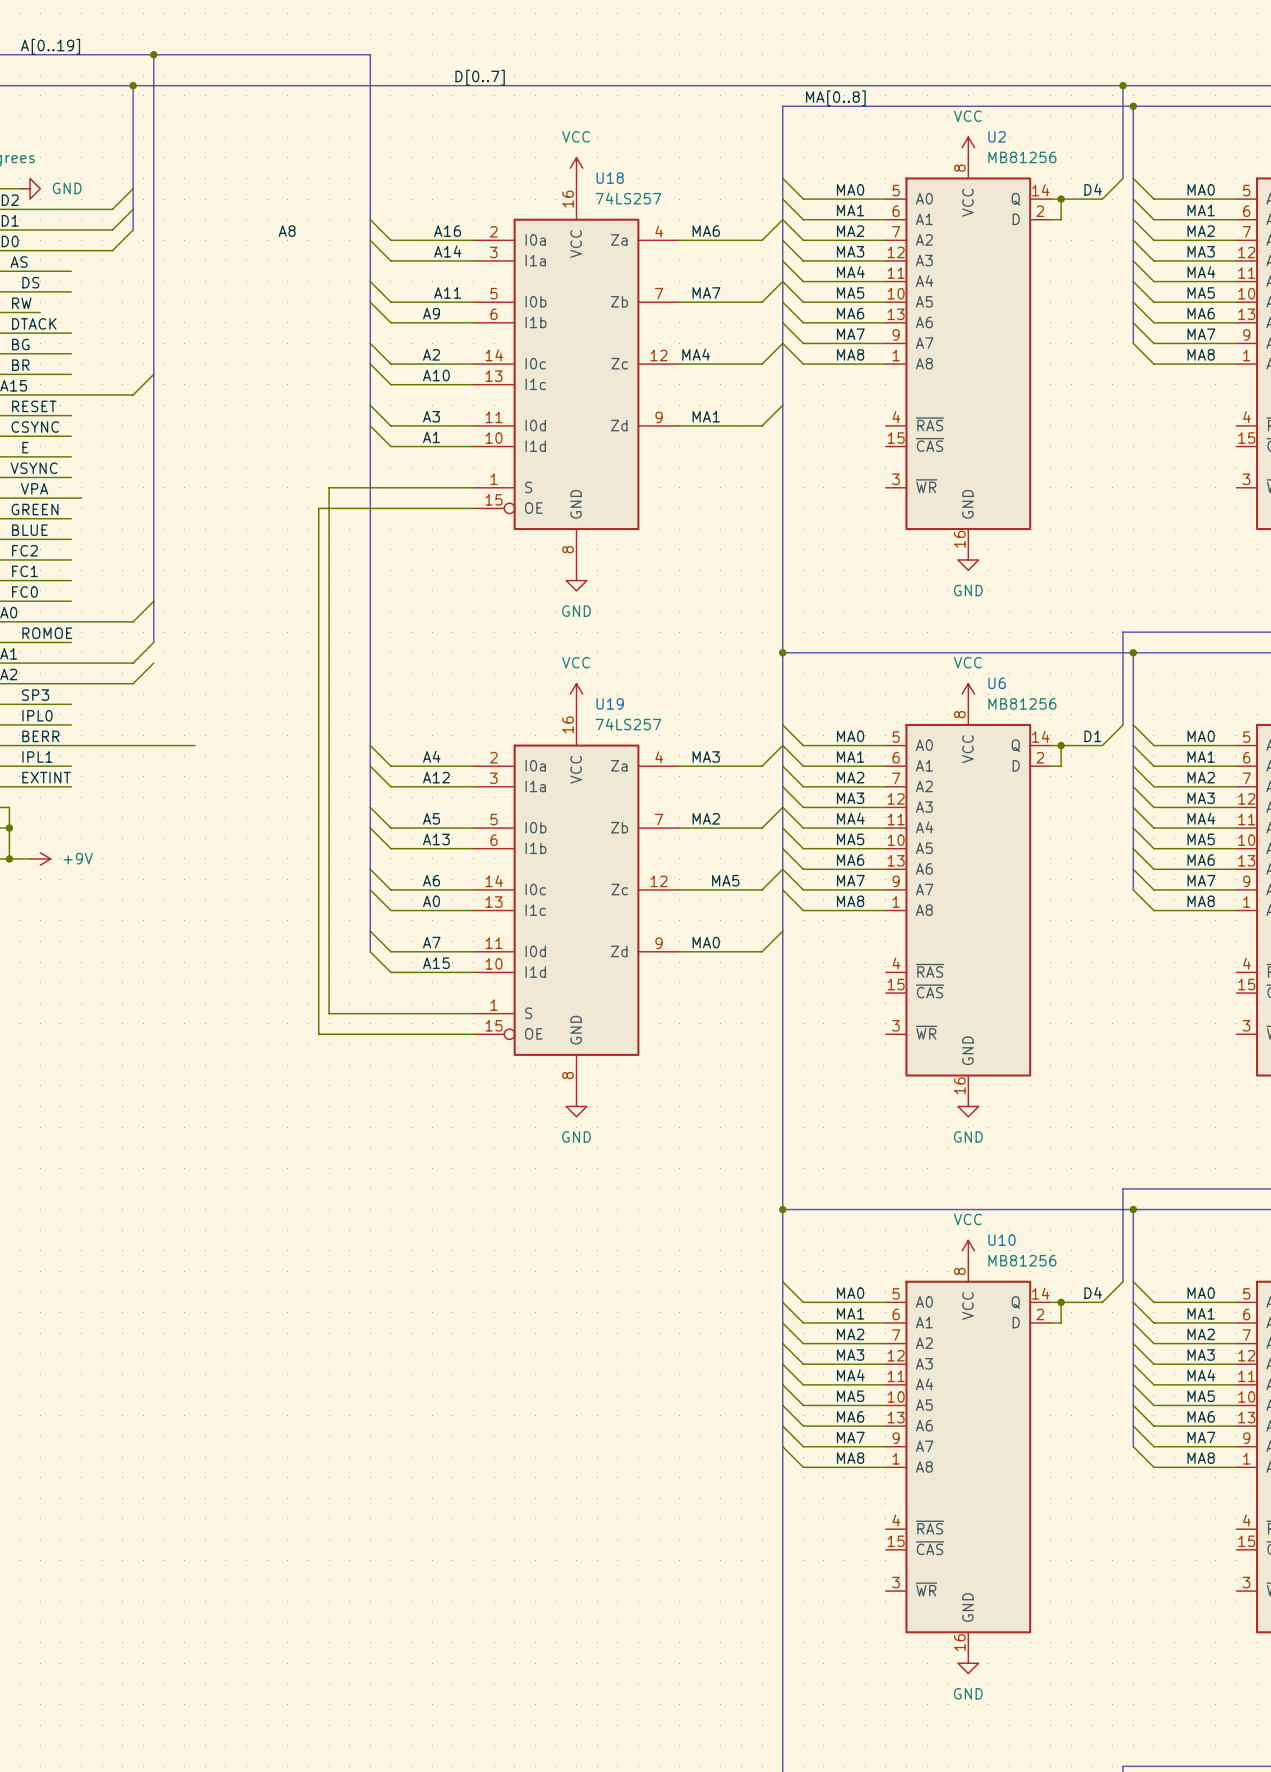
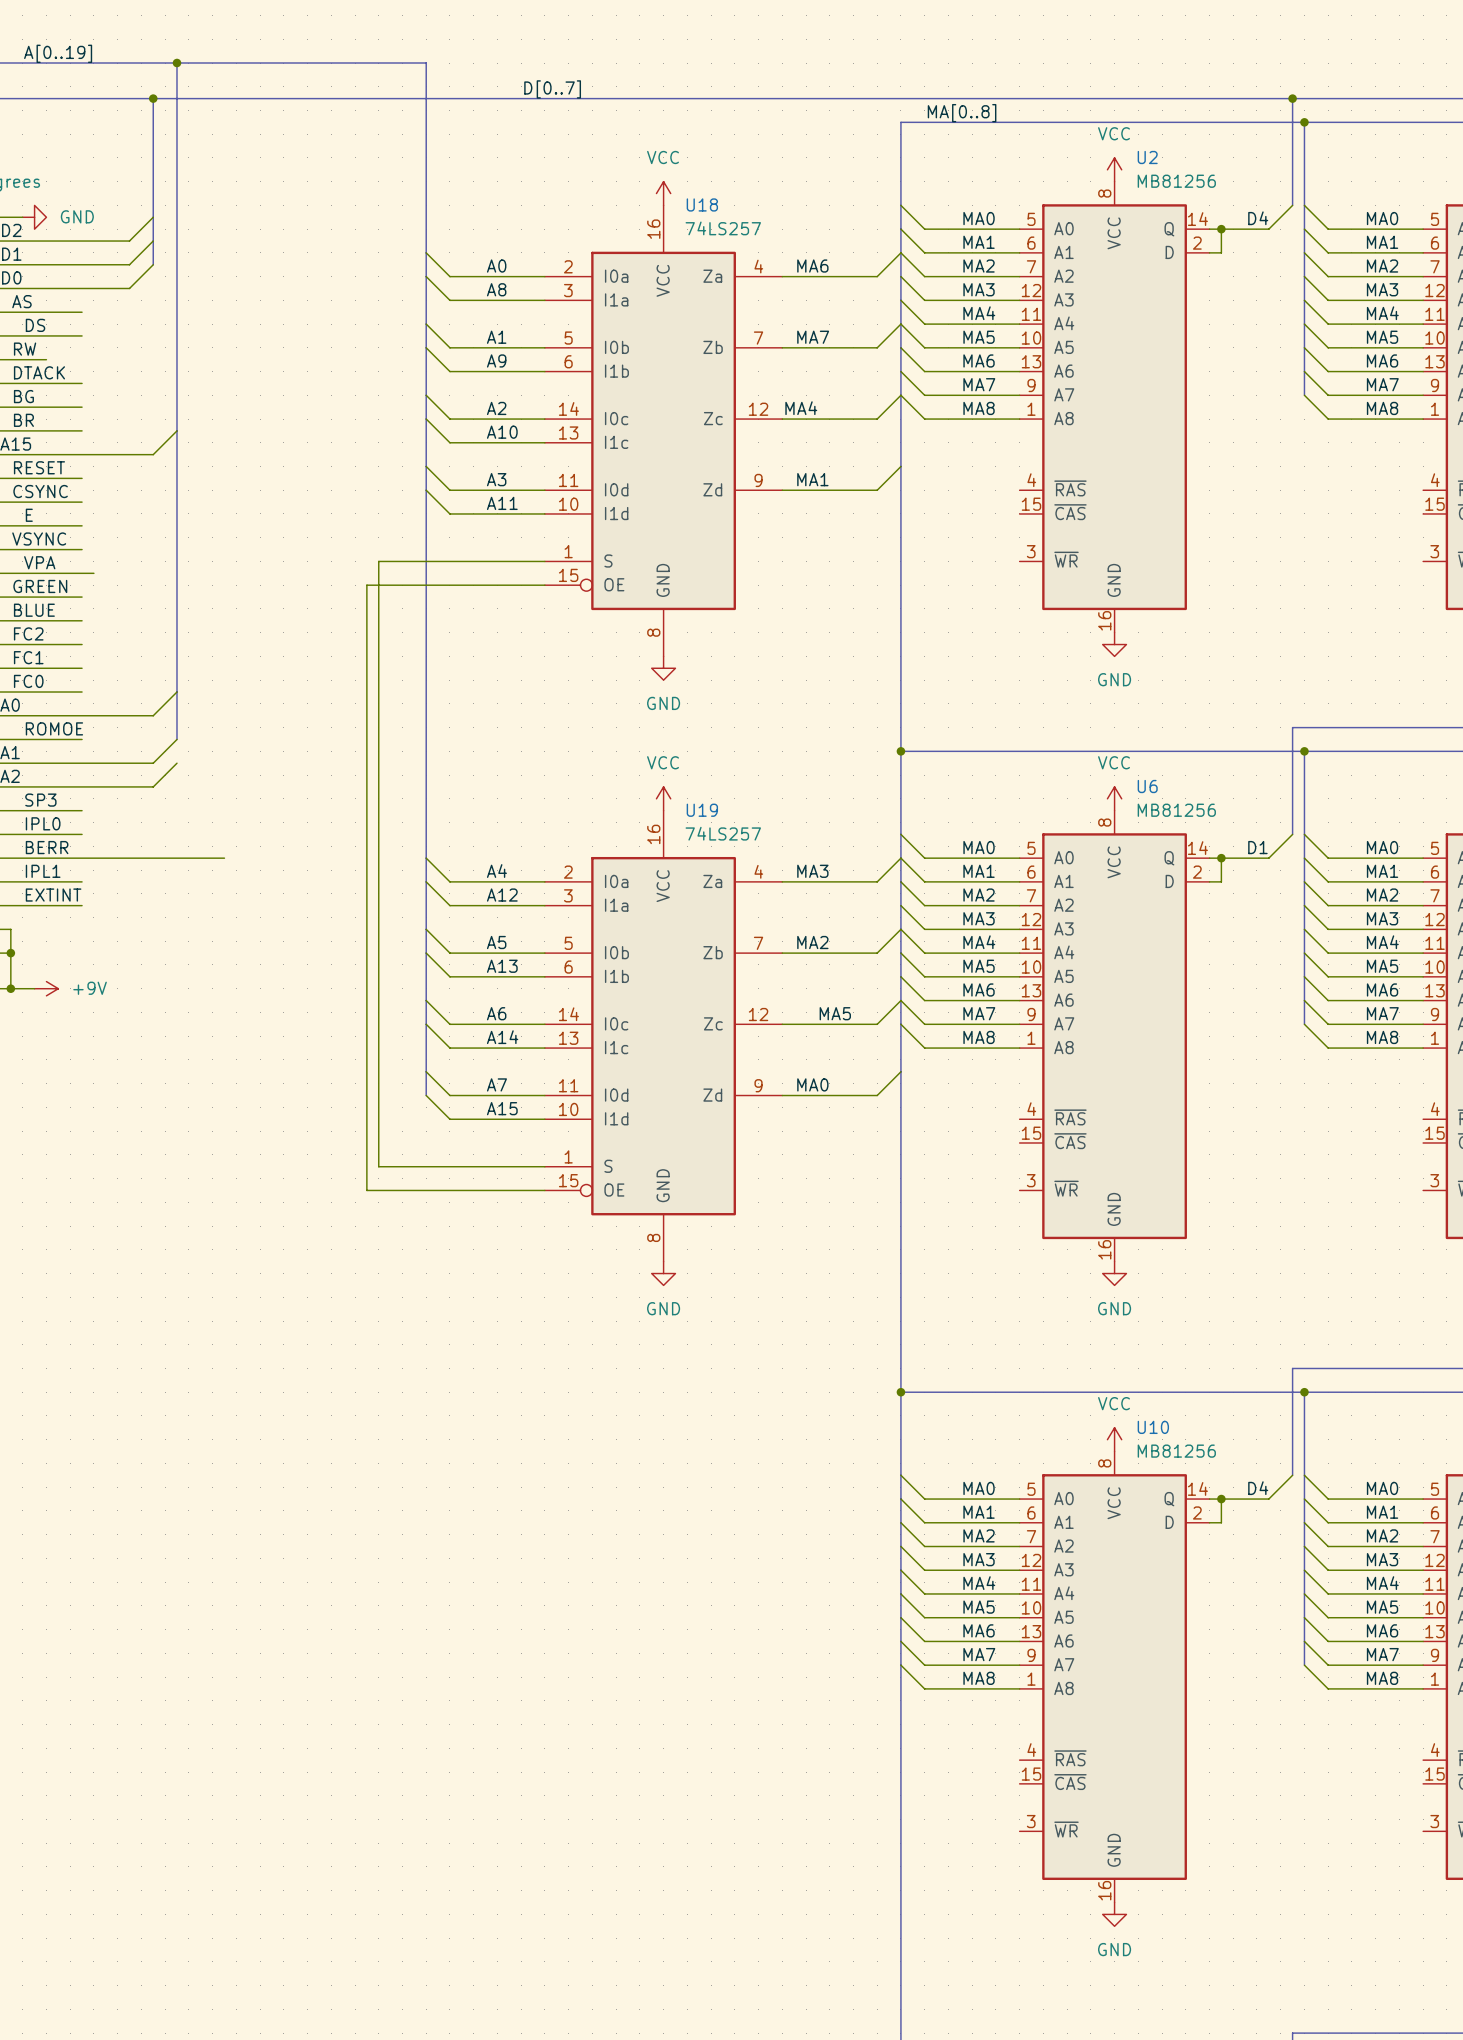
label position: A8 (287, 231) -> A8 (496, 289)
label: none -> A0 (496, 266)
label: A16 (447, 231) -> none
label: A14 (447, 251) -> none
label: A11 (447, 292) -> A1 (496, 337)
label: A1 (431, 437) -> A11 (502, 503)
label: A0 (431, 901) -> A14 (502, 1037)

